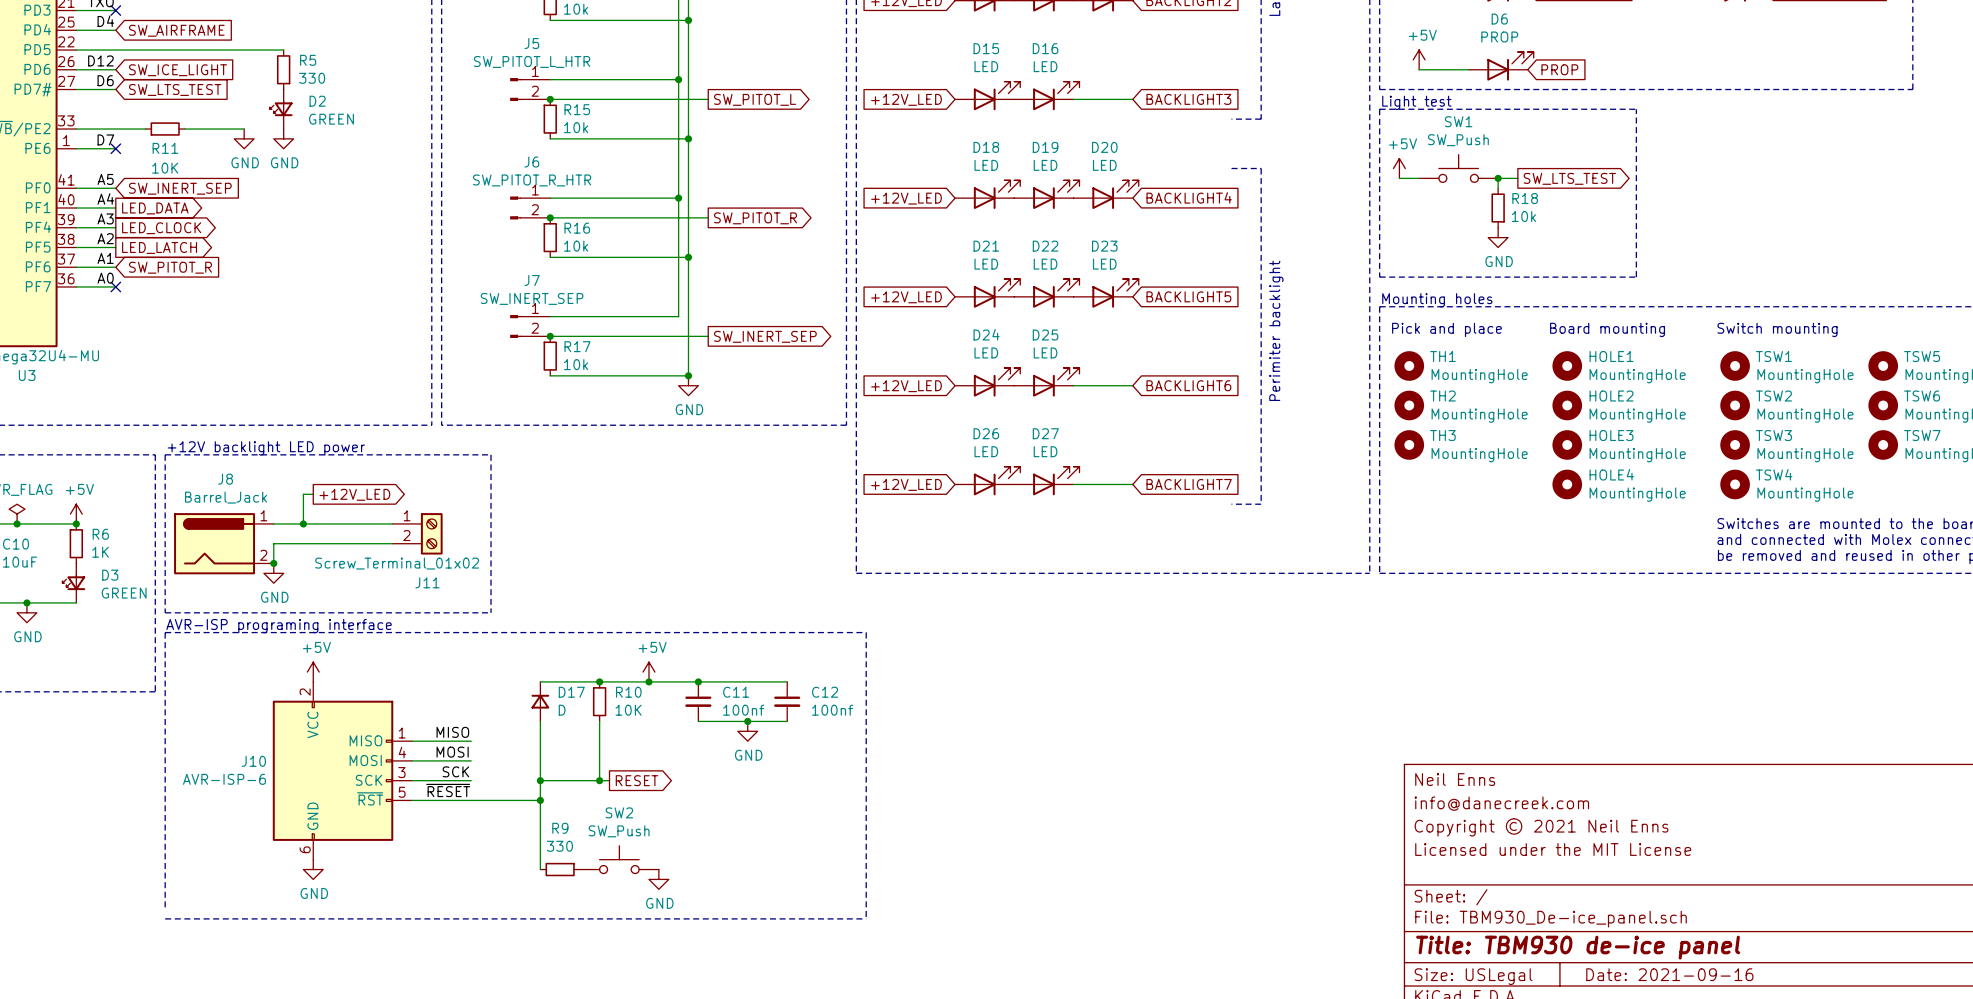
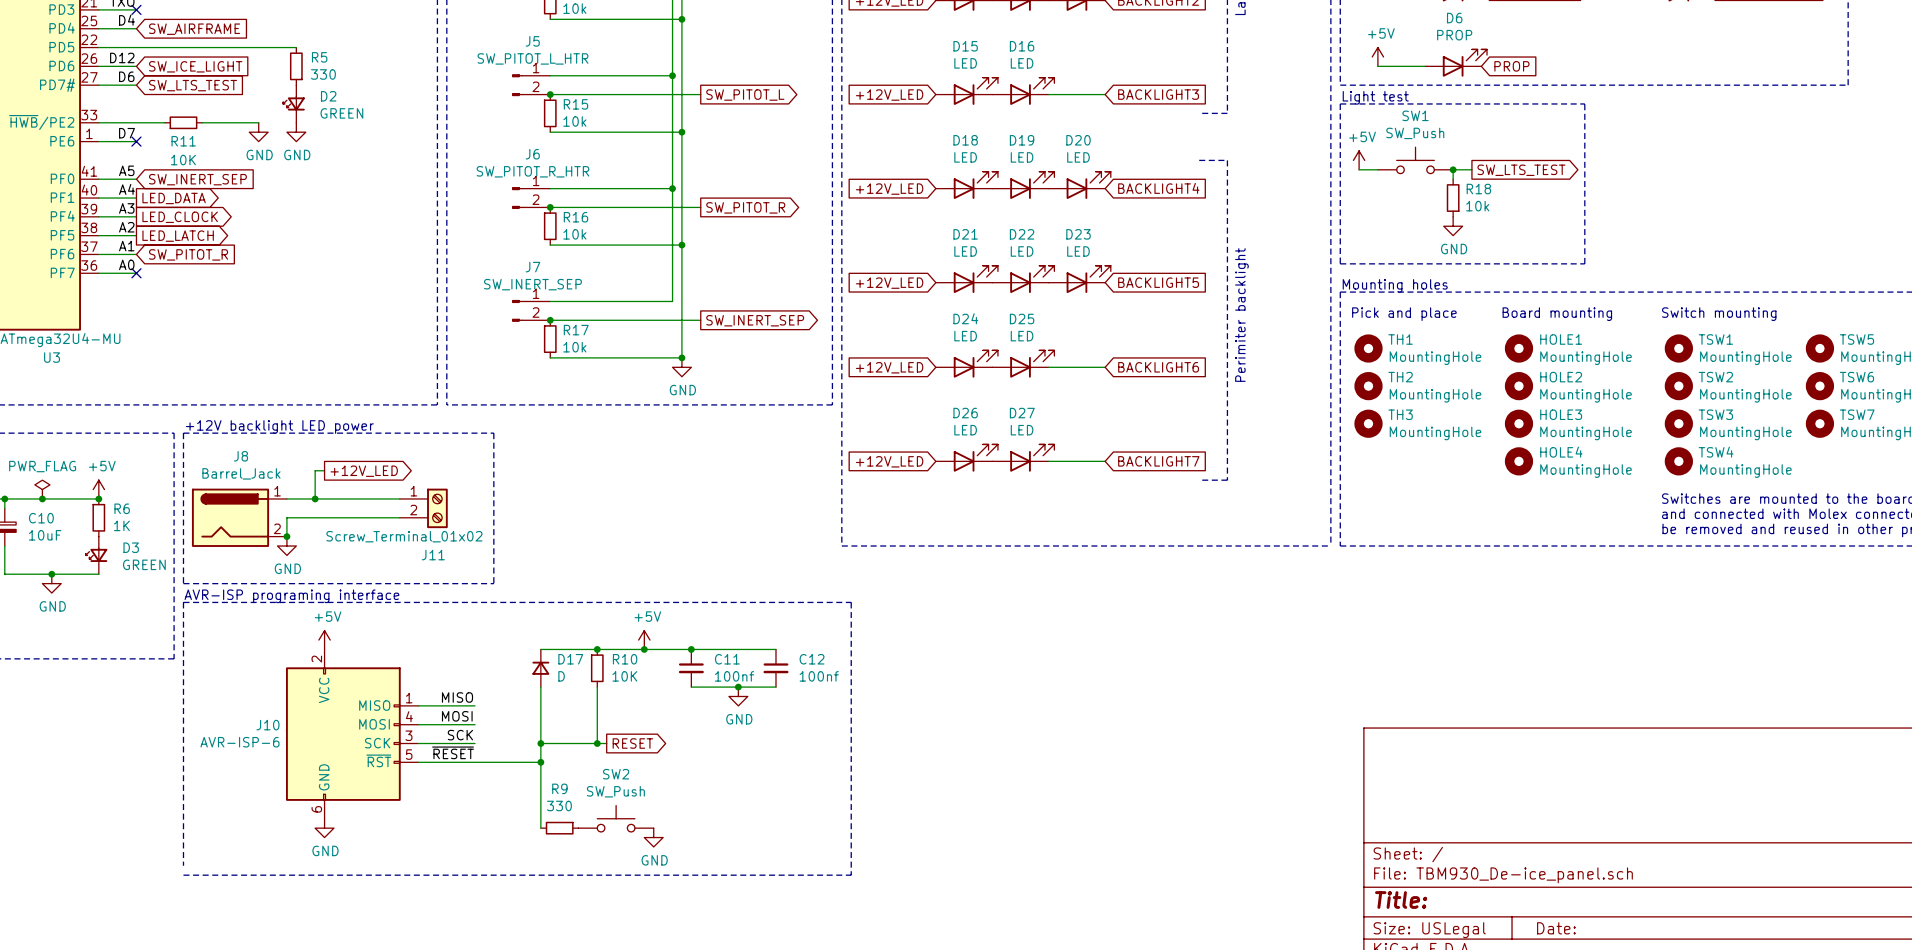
title block: Neil Enns (1455, 779) -> none
title block: info@danecreek.com (1501, 803) -> none
title block: Copyright © 2021 Neil Enns (1541, 827) -> none
title block: Licensed under the MIT License (1553, 849) -> none
title block: Title: TBM930 de-ice panel (1578, 947) -> Title: (1401, 900)
title block: Date: 2021-09-16 (1669, 974) -> Date: (1556, 928)

